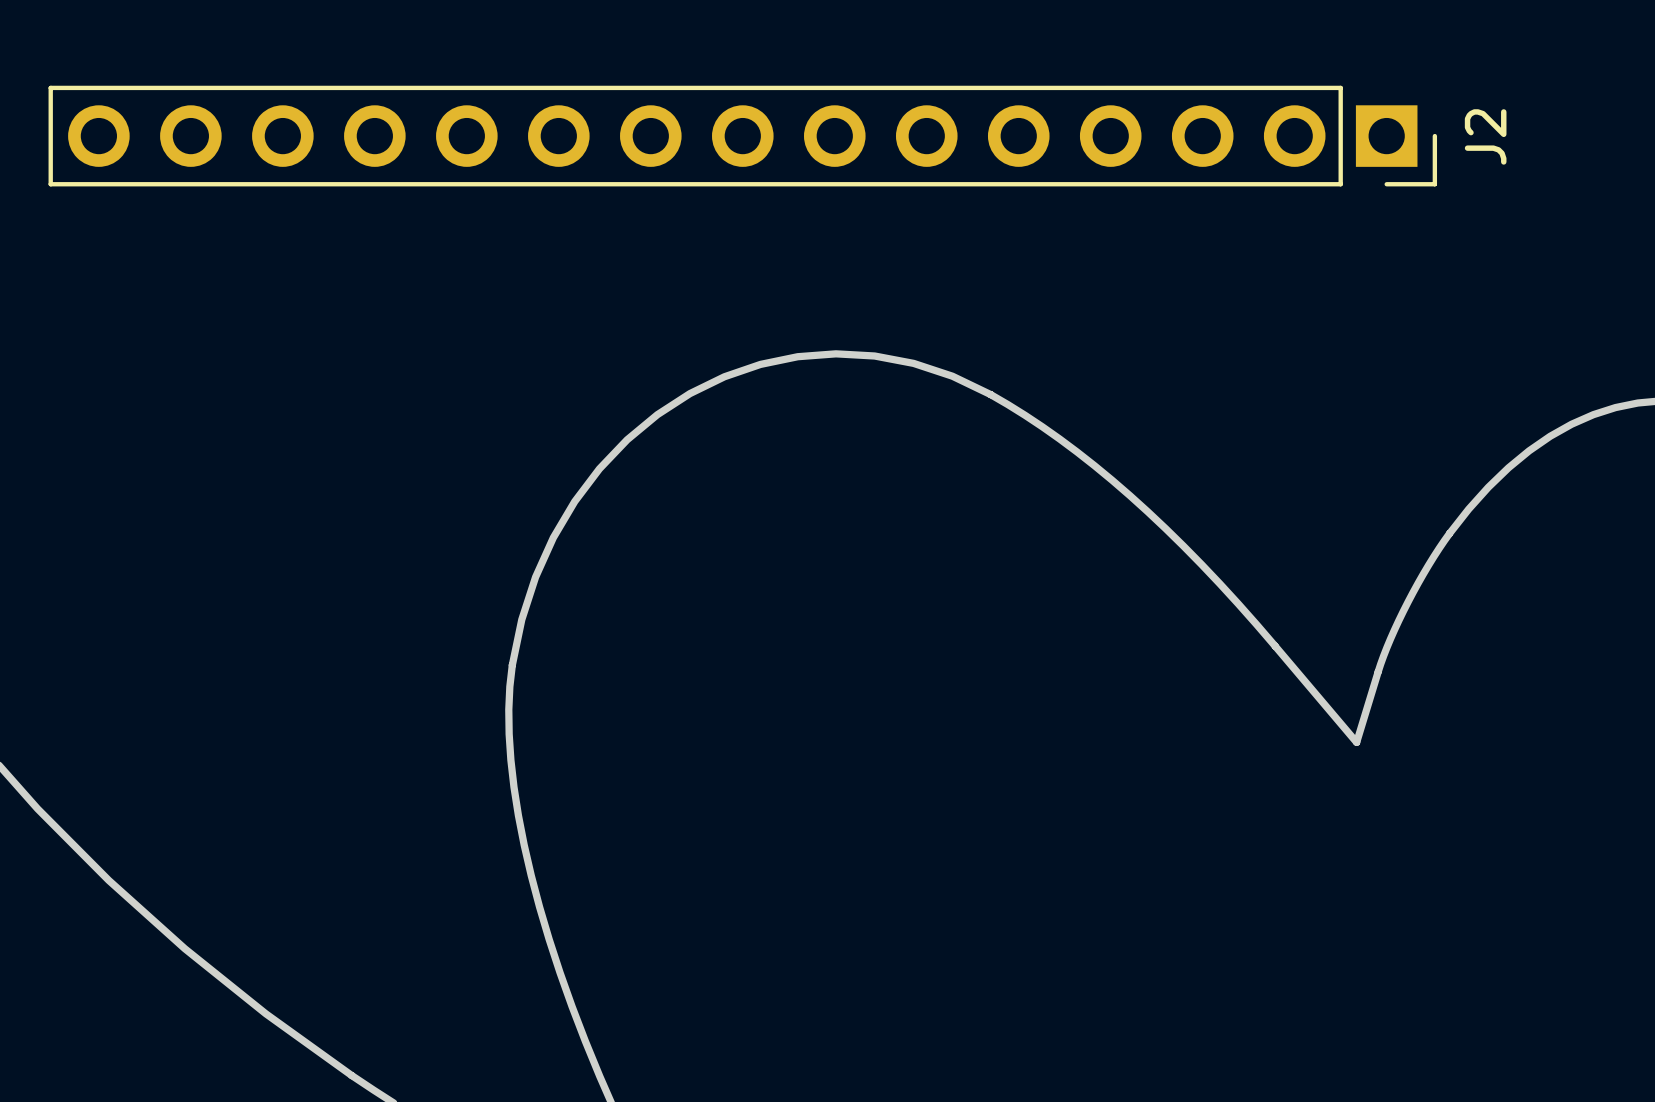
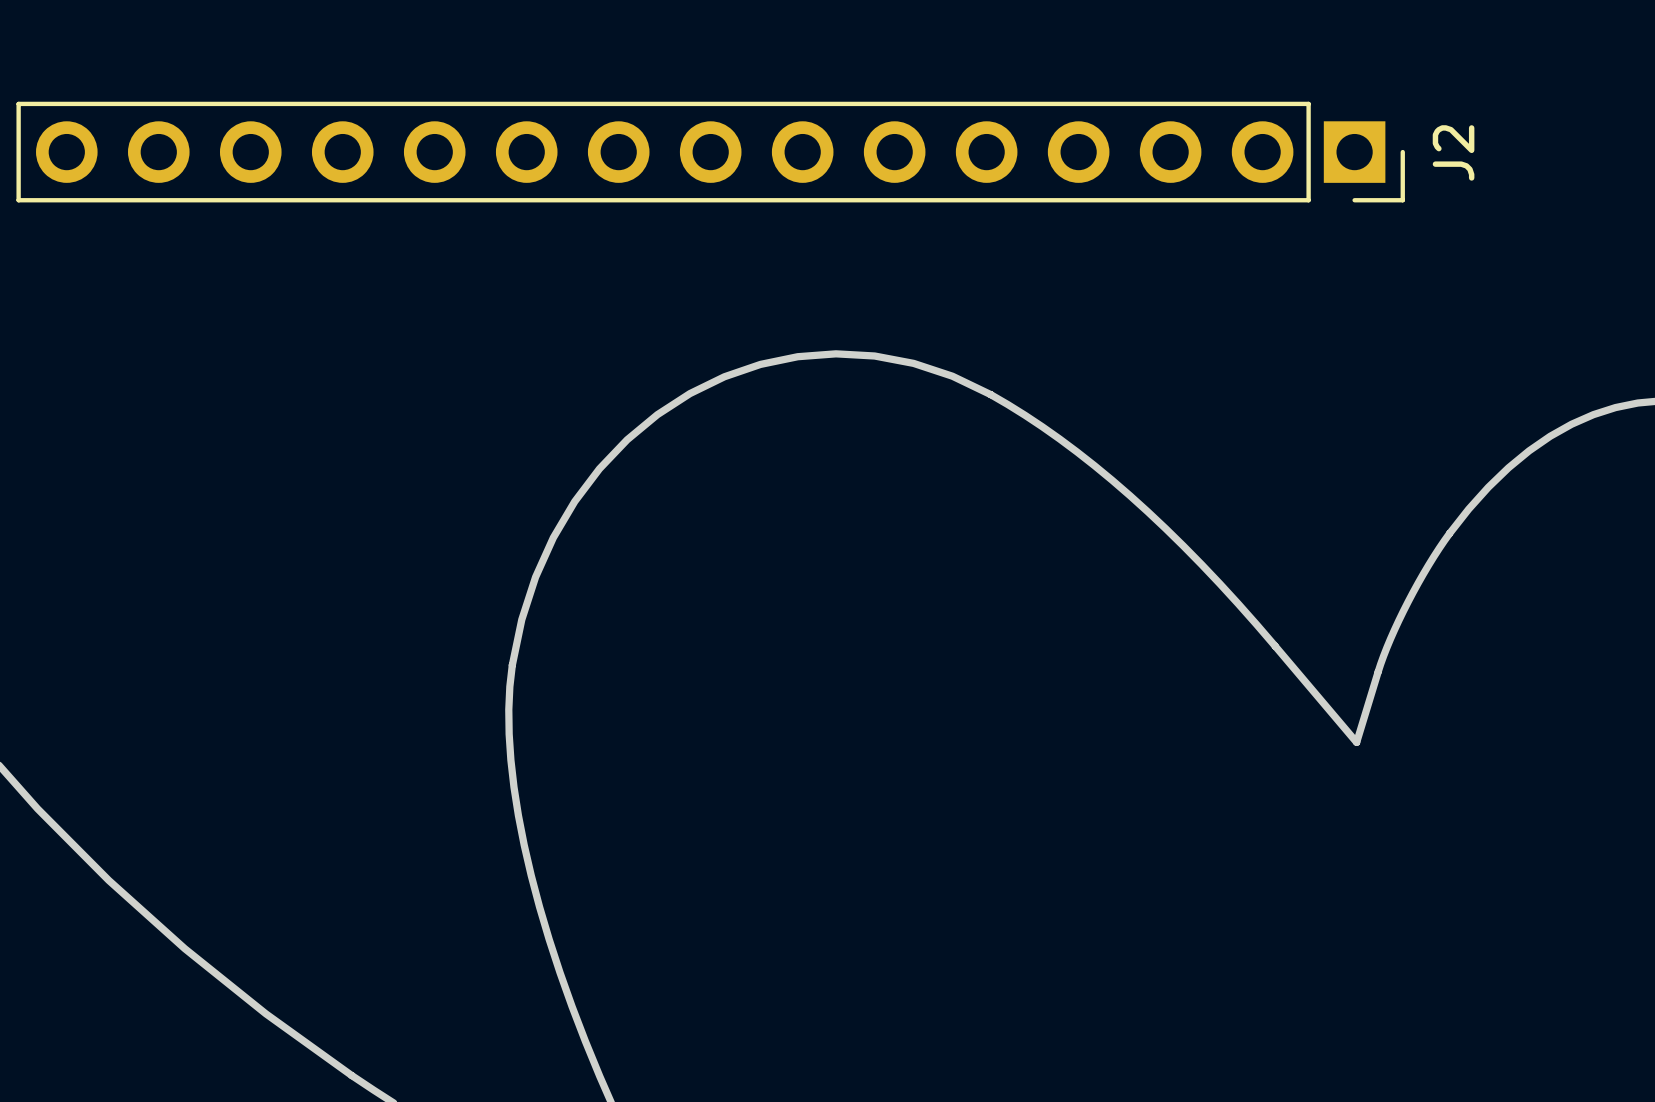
J2 position: (742, 136) -> (710, 152)

